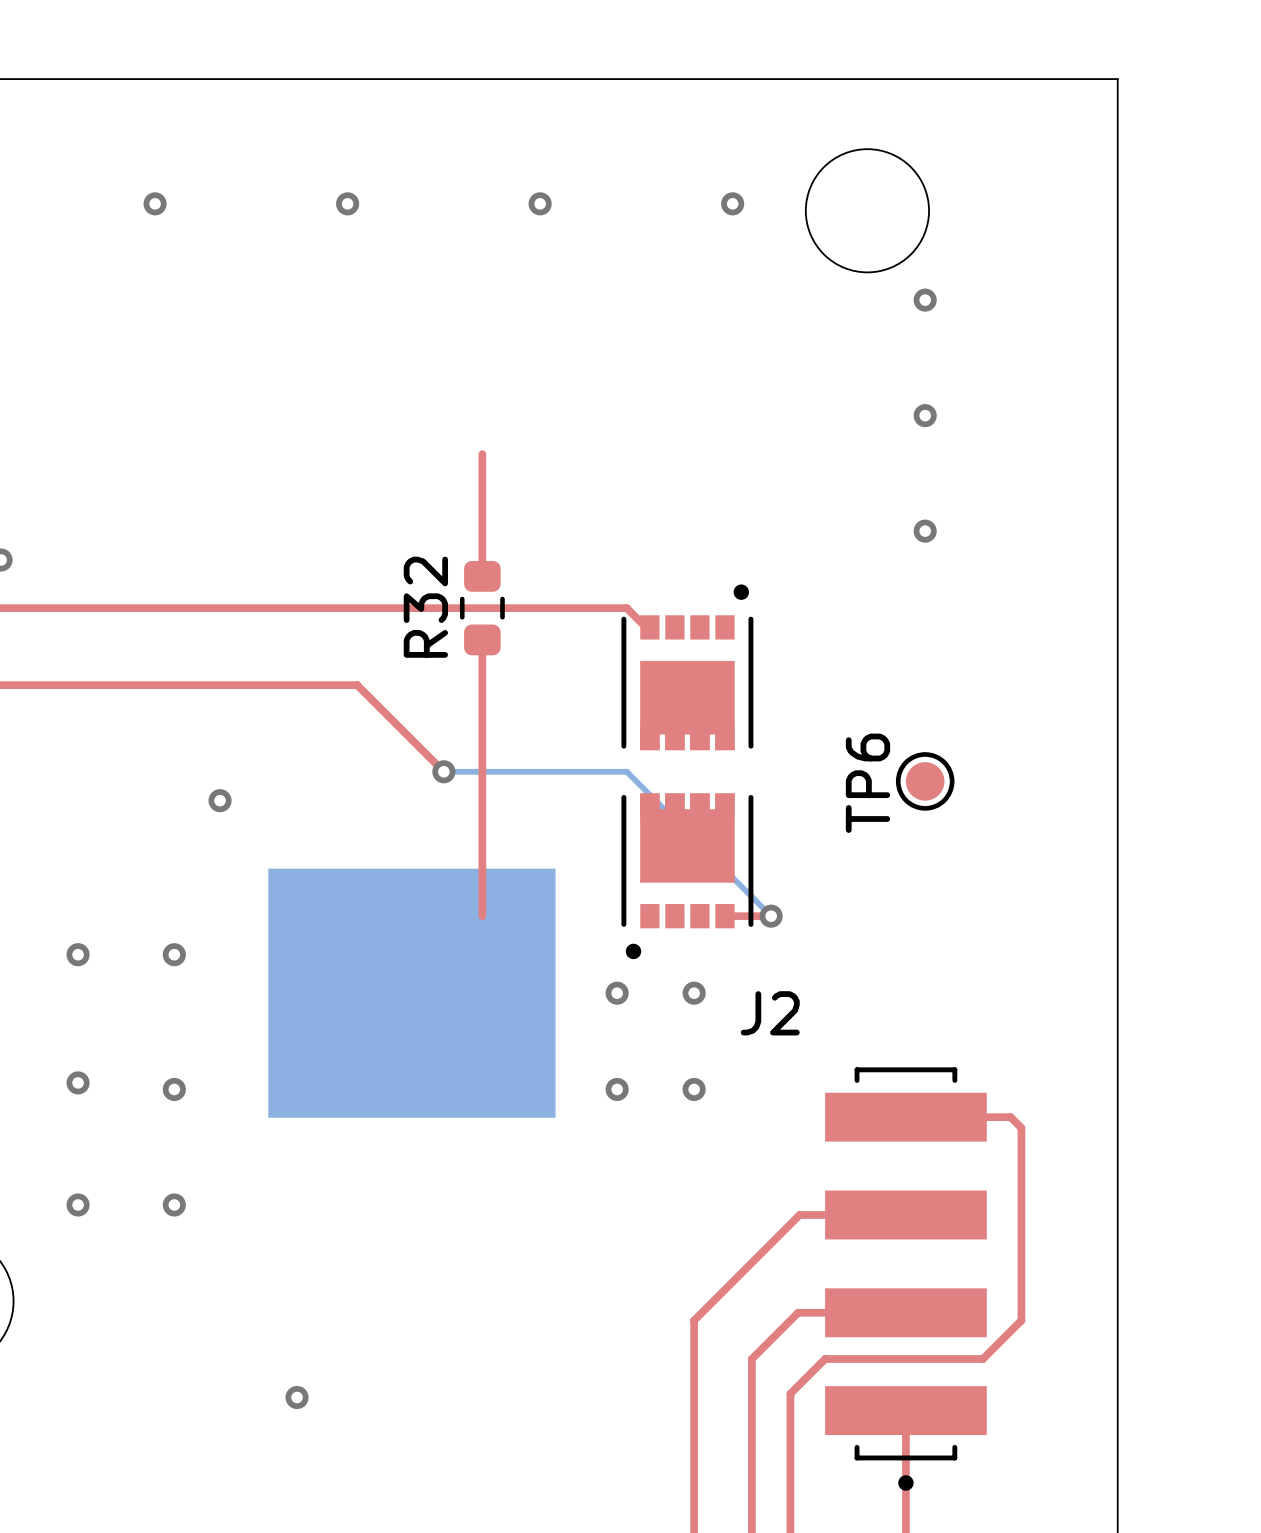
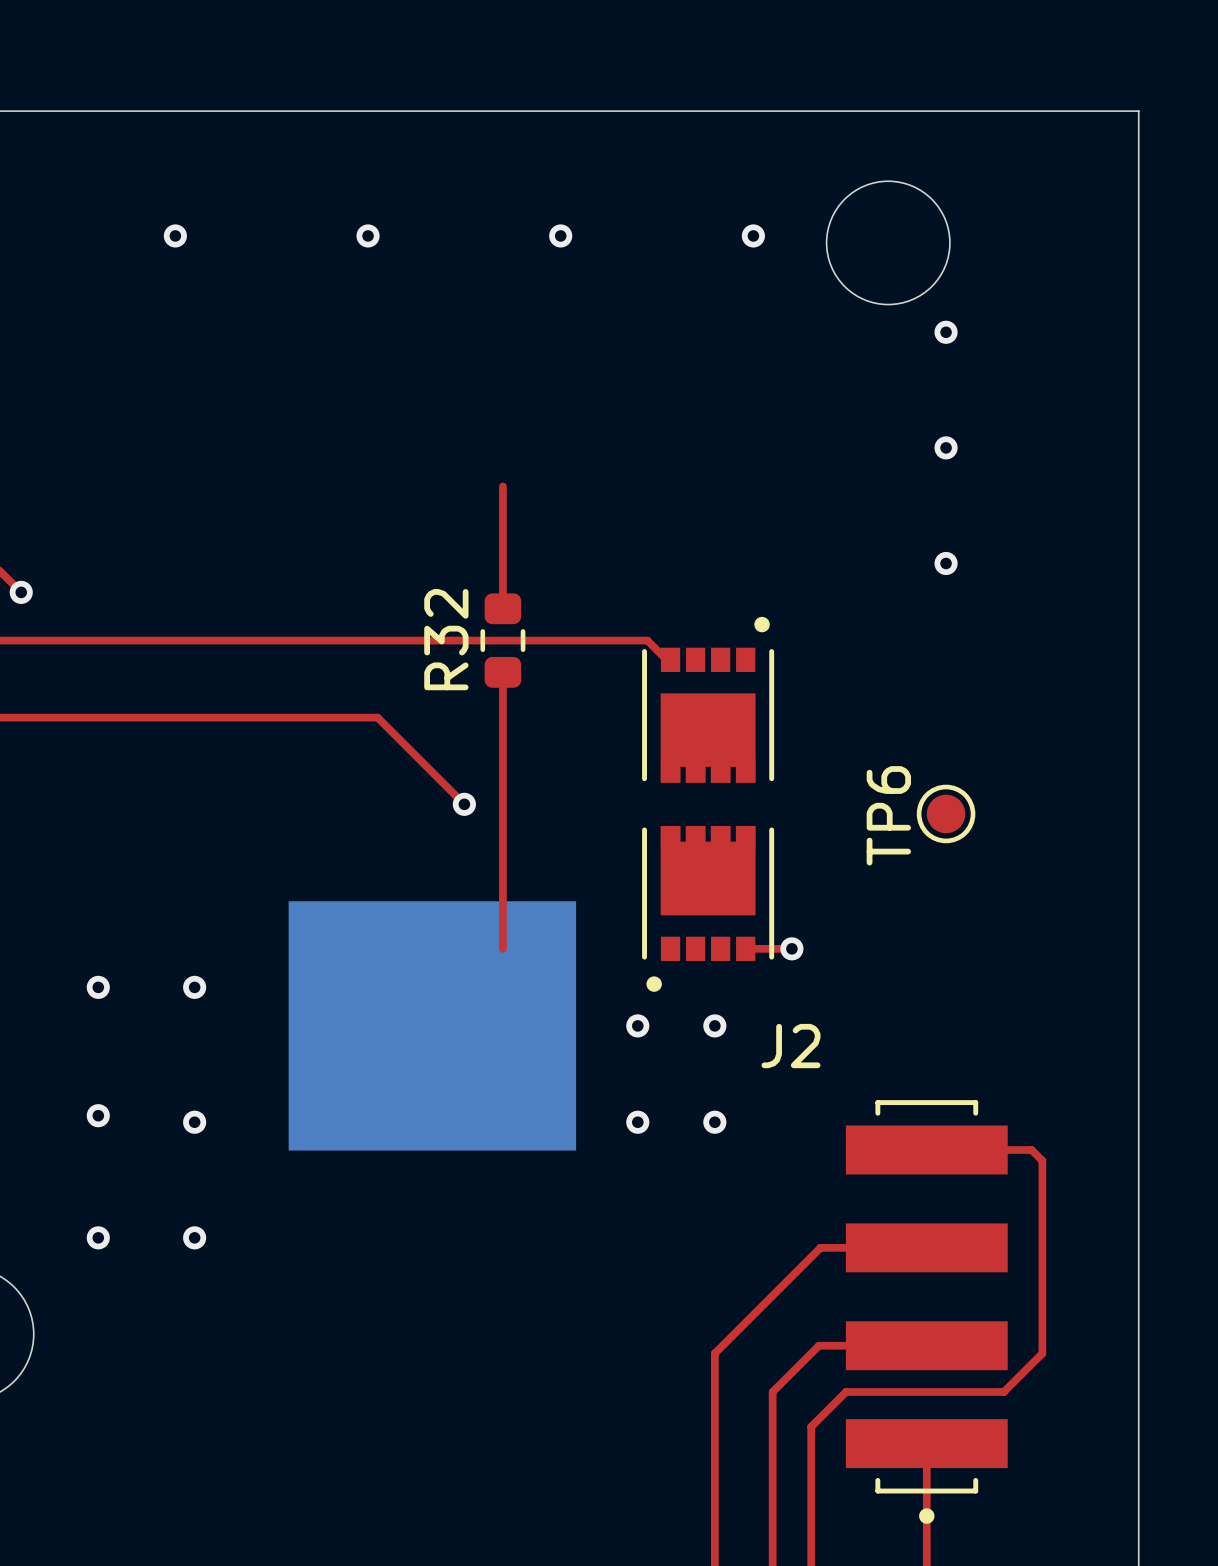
bottom track: (443, 771) (626, 771) (771, 916) -> none
via: (220, 800) -> none
via: (297, 1397) -> none

